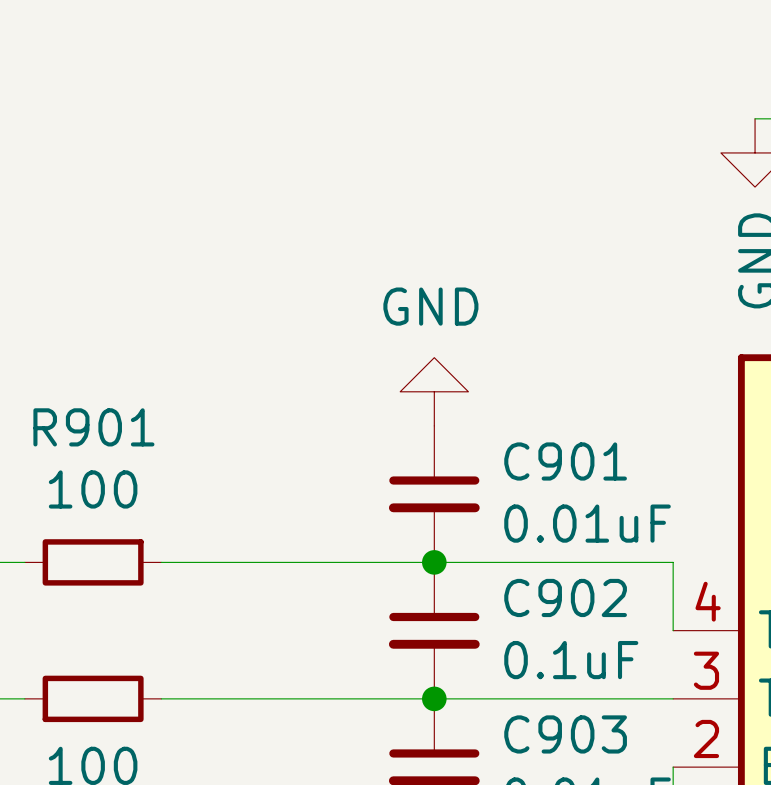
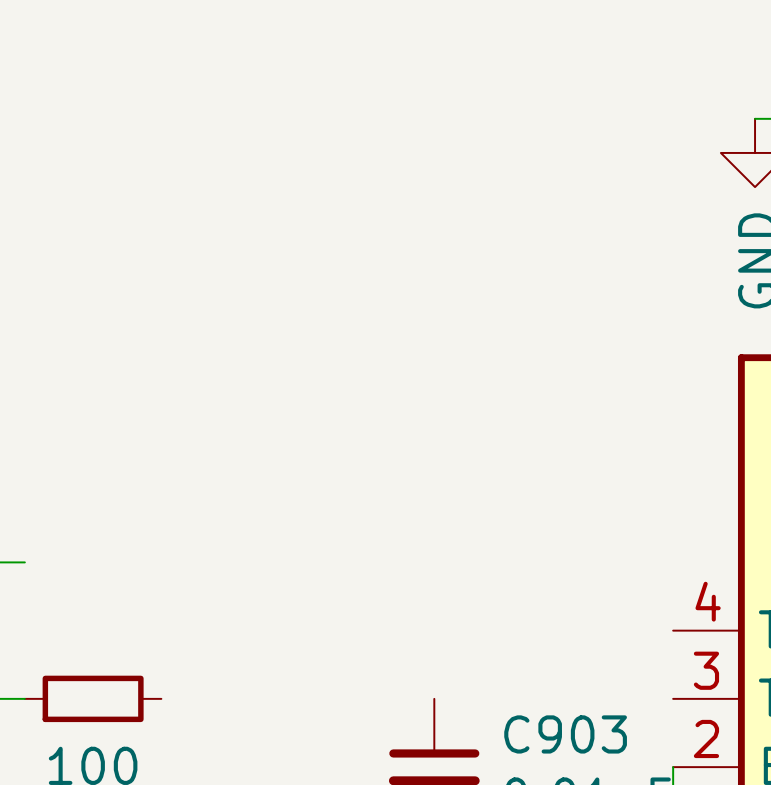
power symbol: GND (434, 391) -> none
C901: 0.01uF (434, 494) -> none
R901: 100 (93, 562) -> none
wire: (161, 562) (673, 562) (673, 630) -> none
junction: (434, 562) -> none
C902: 0.1uF (434, 630) -> none
wire: (161, 698) (673, 698) -> none
junction: (434, 698) -> none

